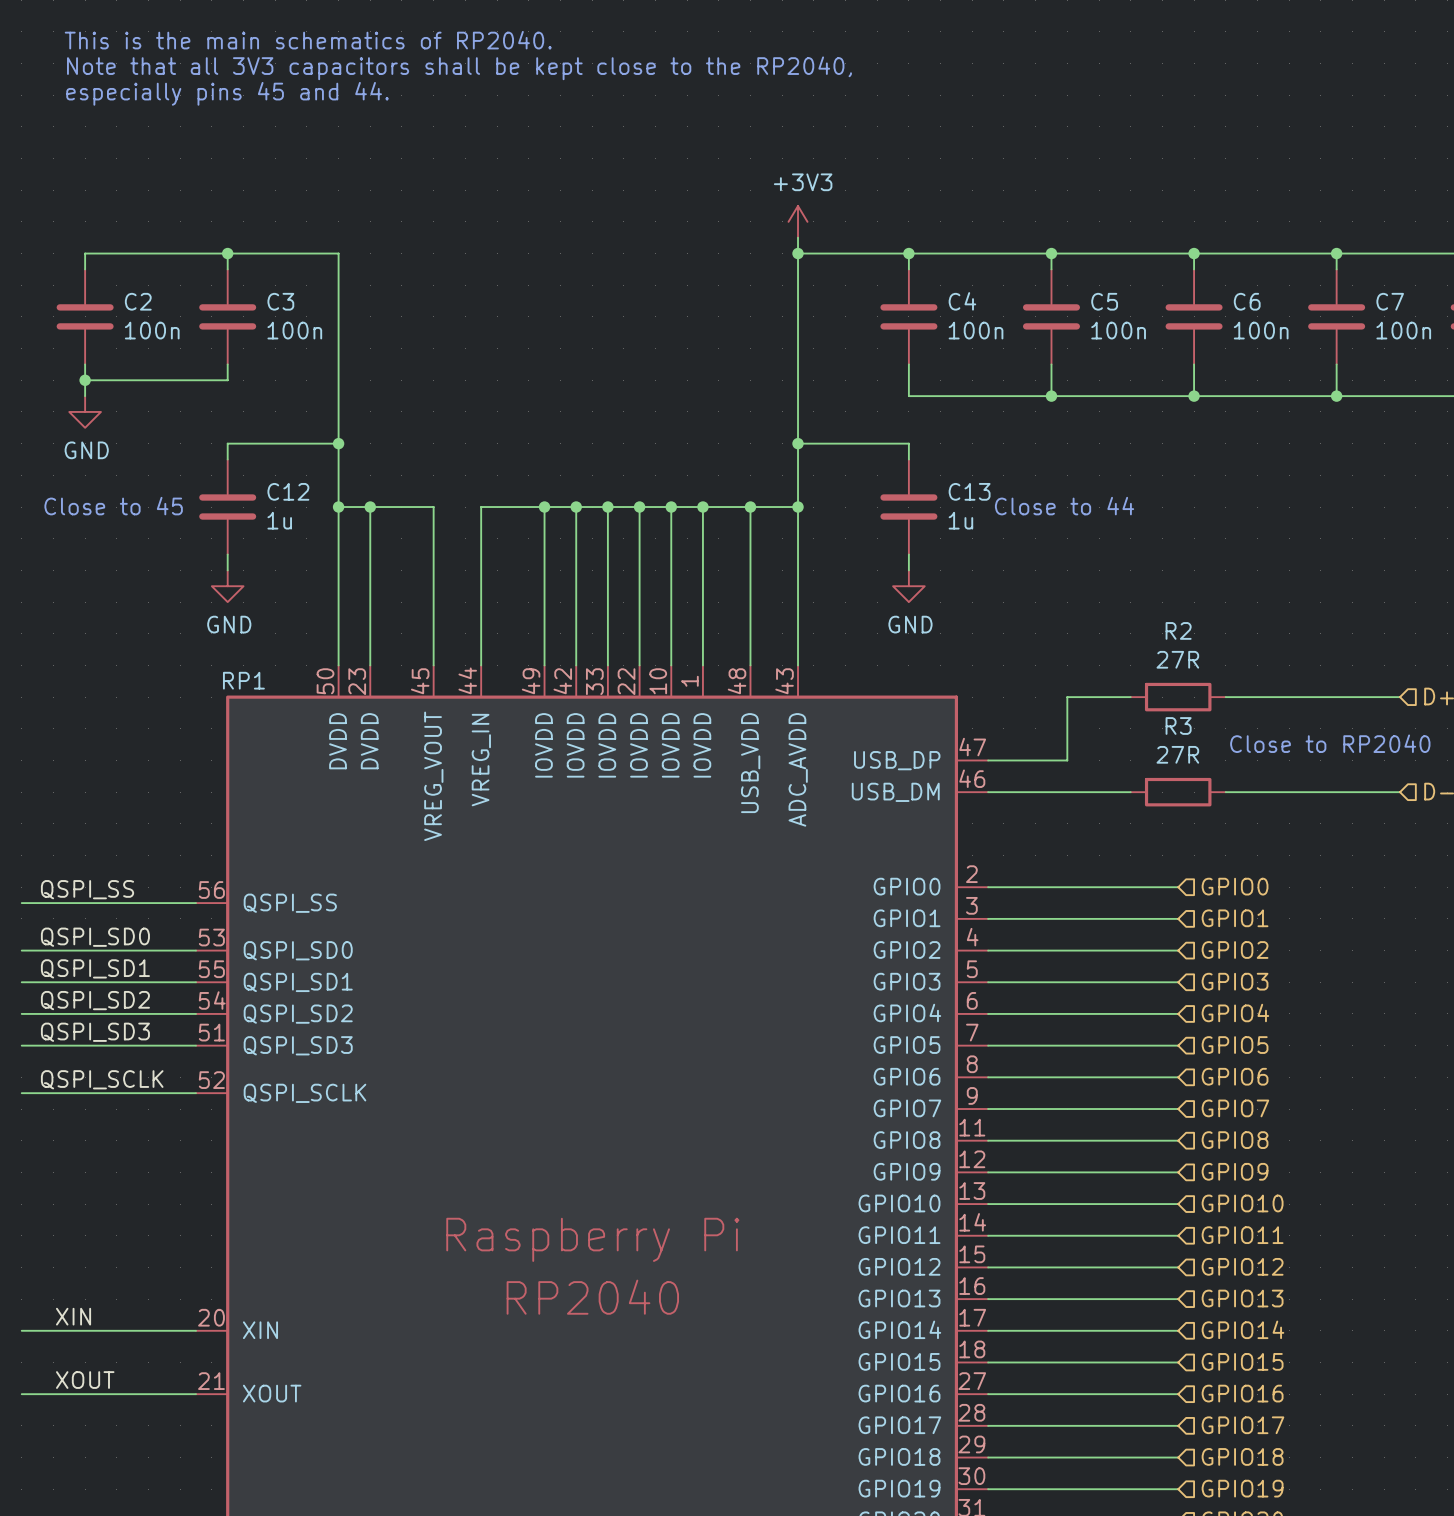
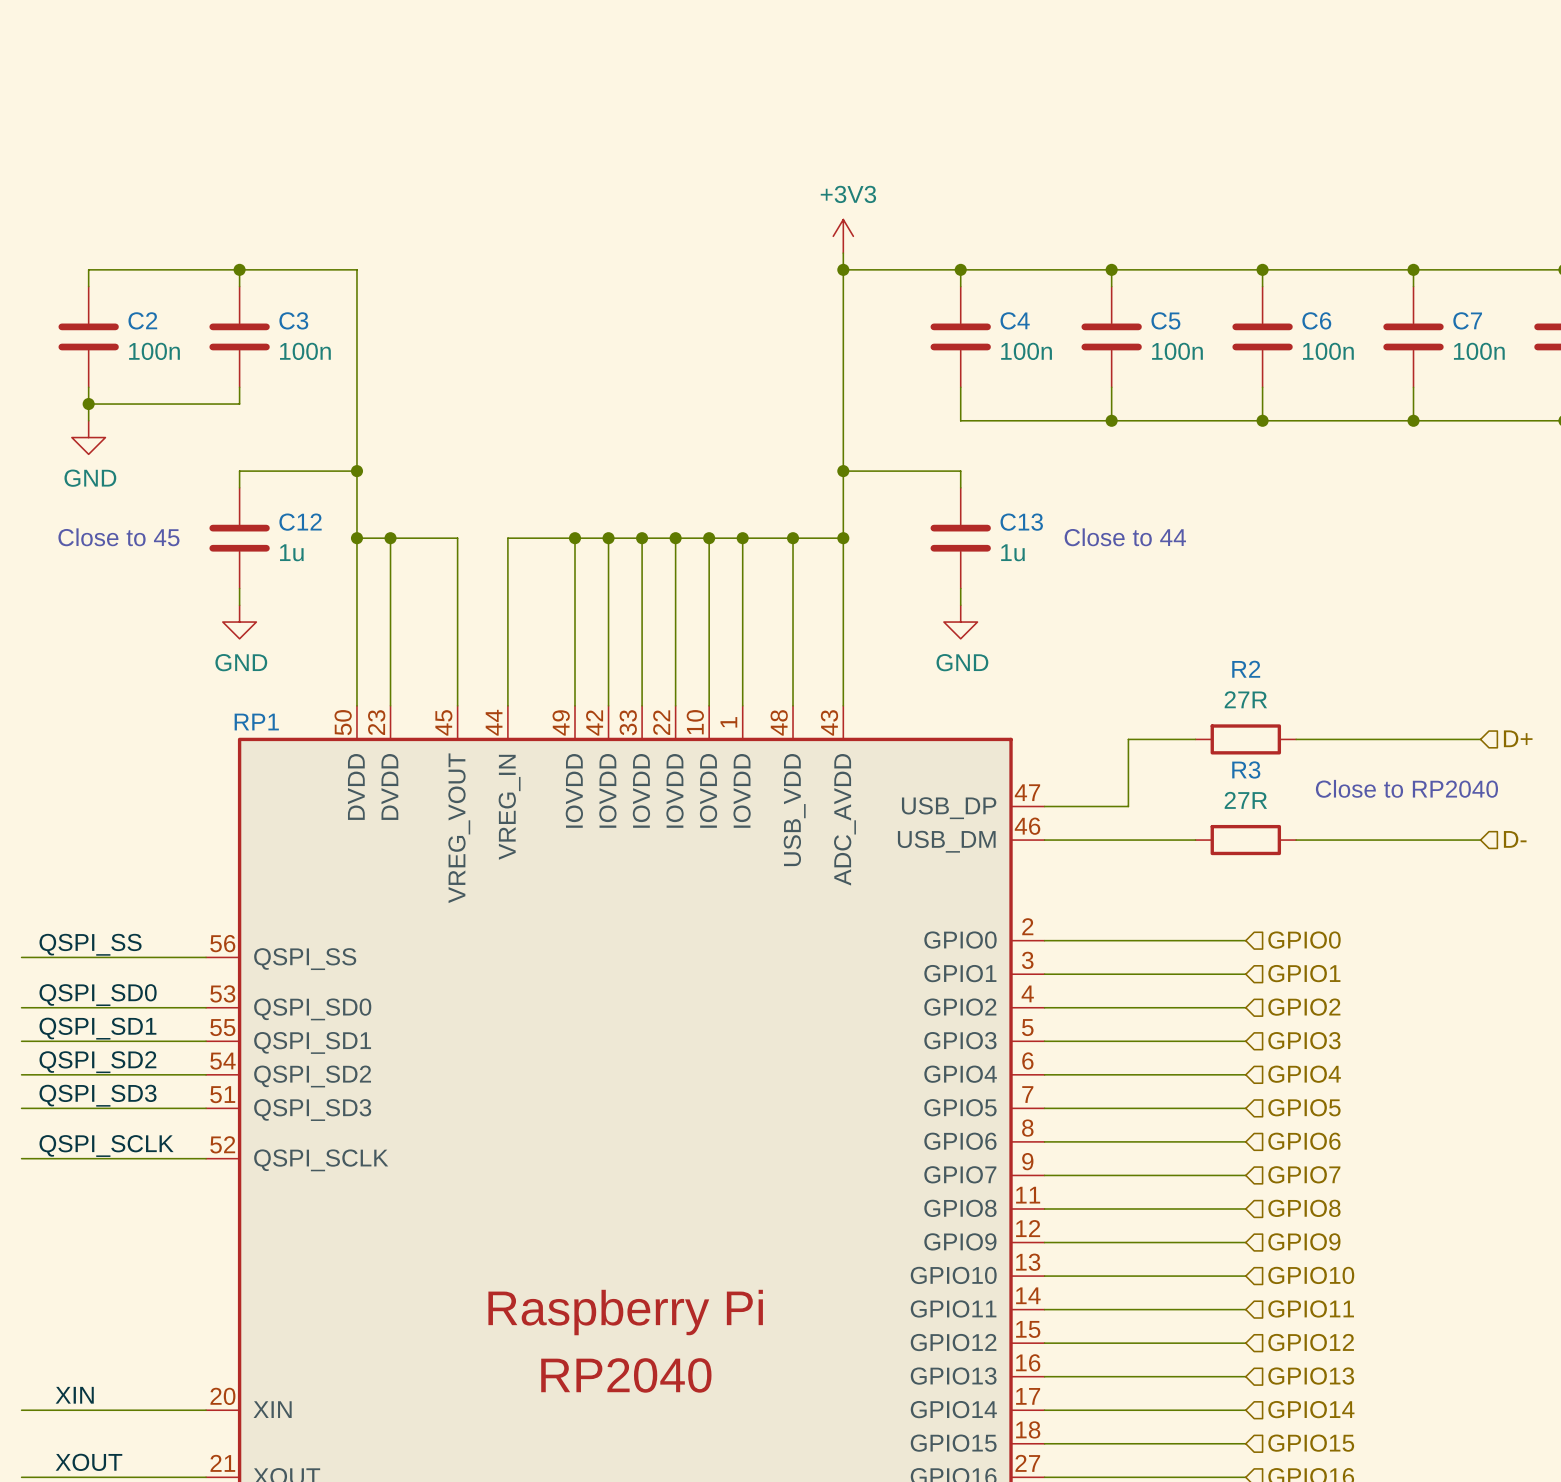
text: This is the main schematics of RP2040. (308, 40) -> none
text: Note that all 3V3 capacitors shall be kept close to the RP2040, (459, 68) -> none
text: especially pins 45 and 44. (227, 93) -> none

